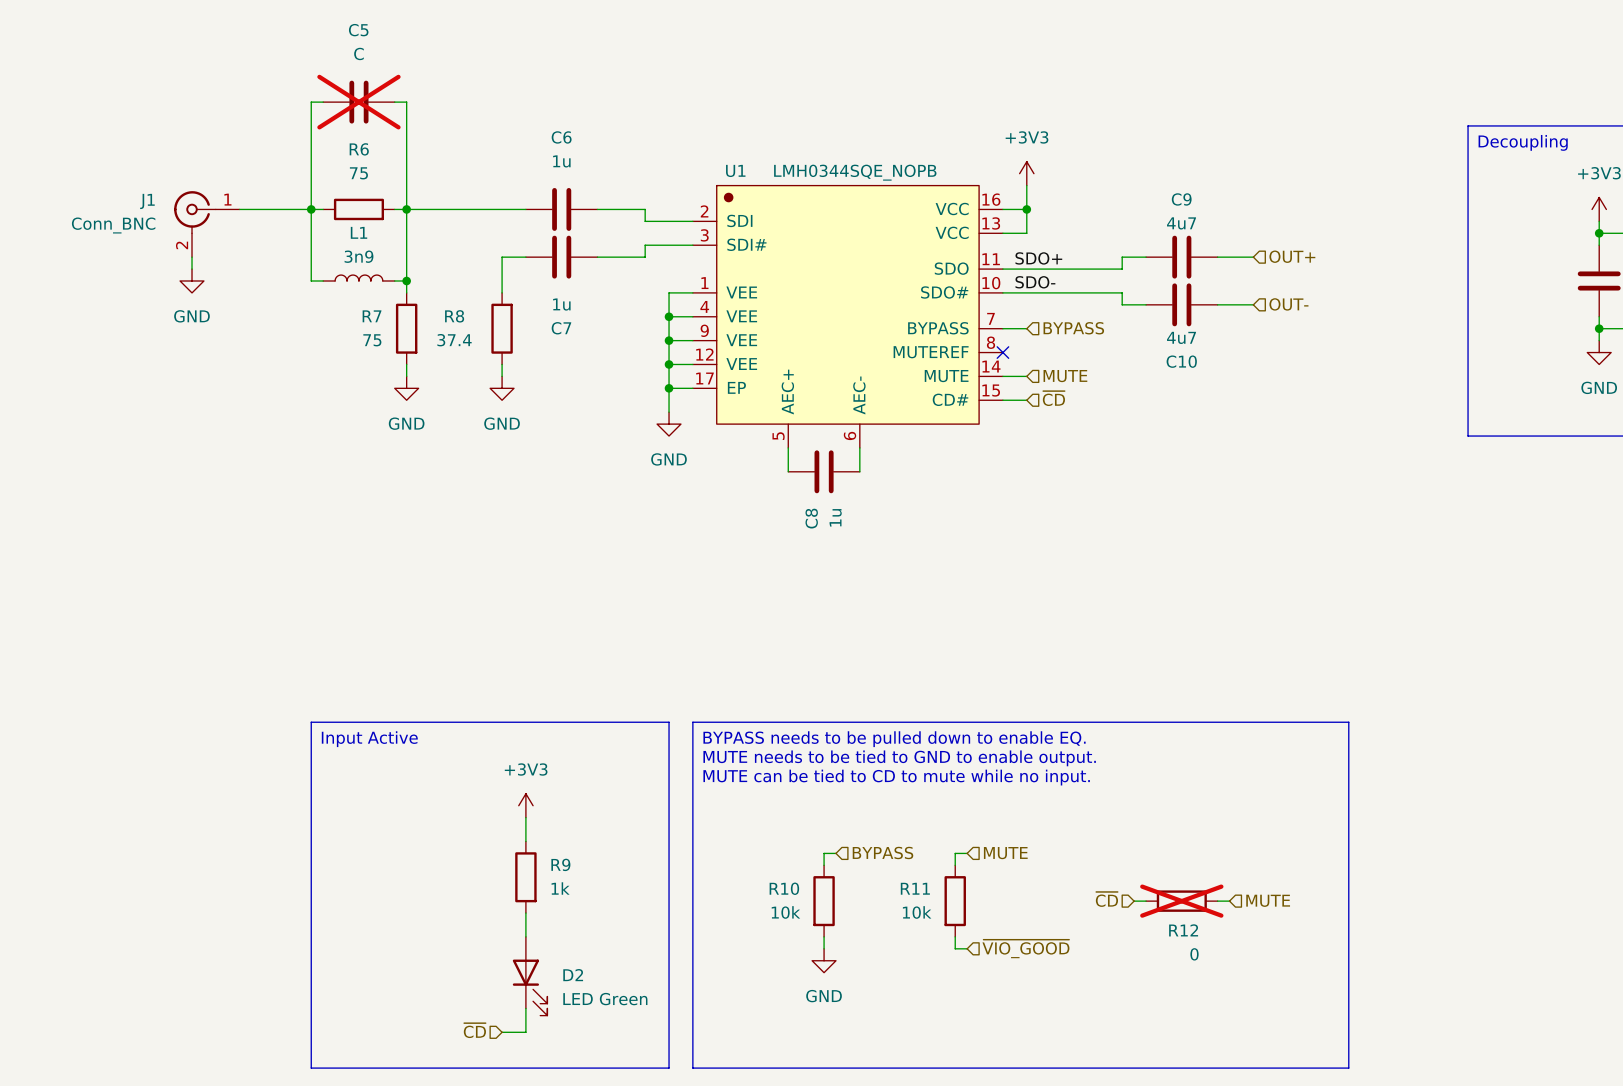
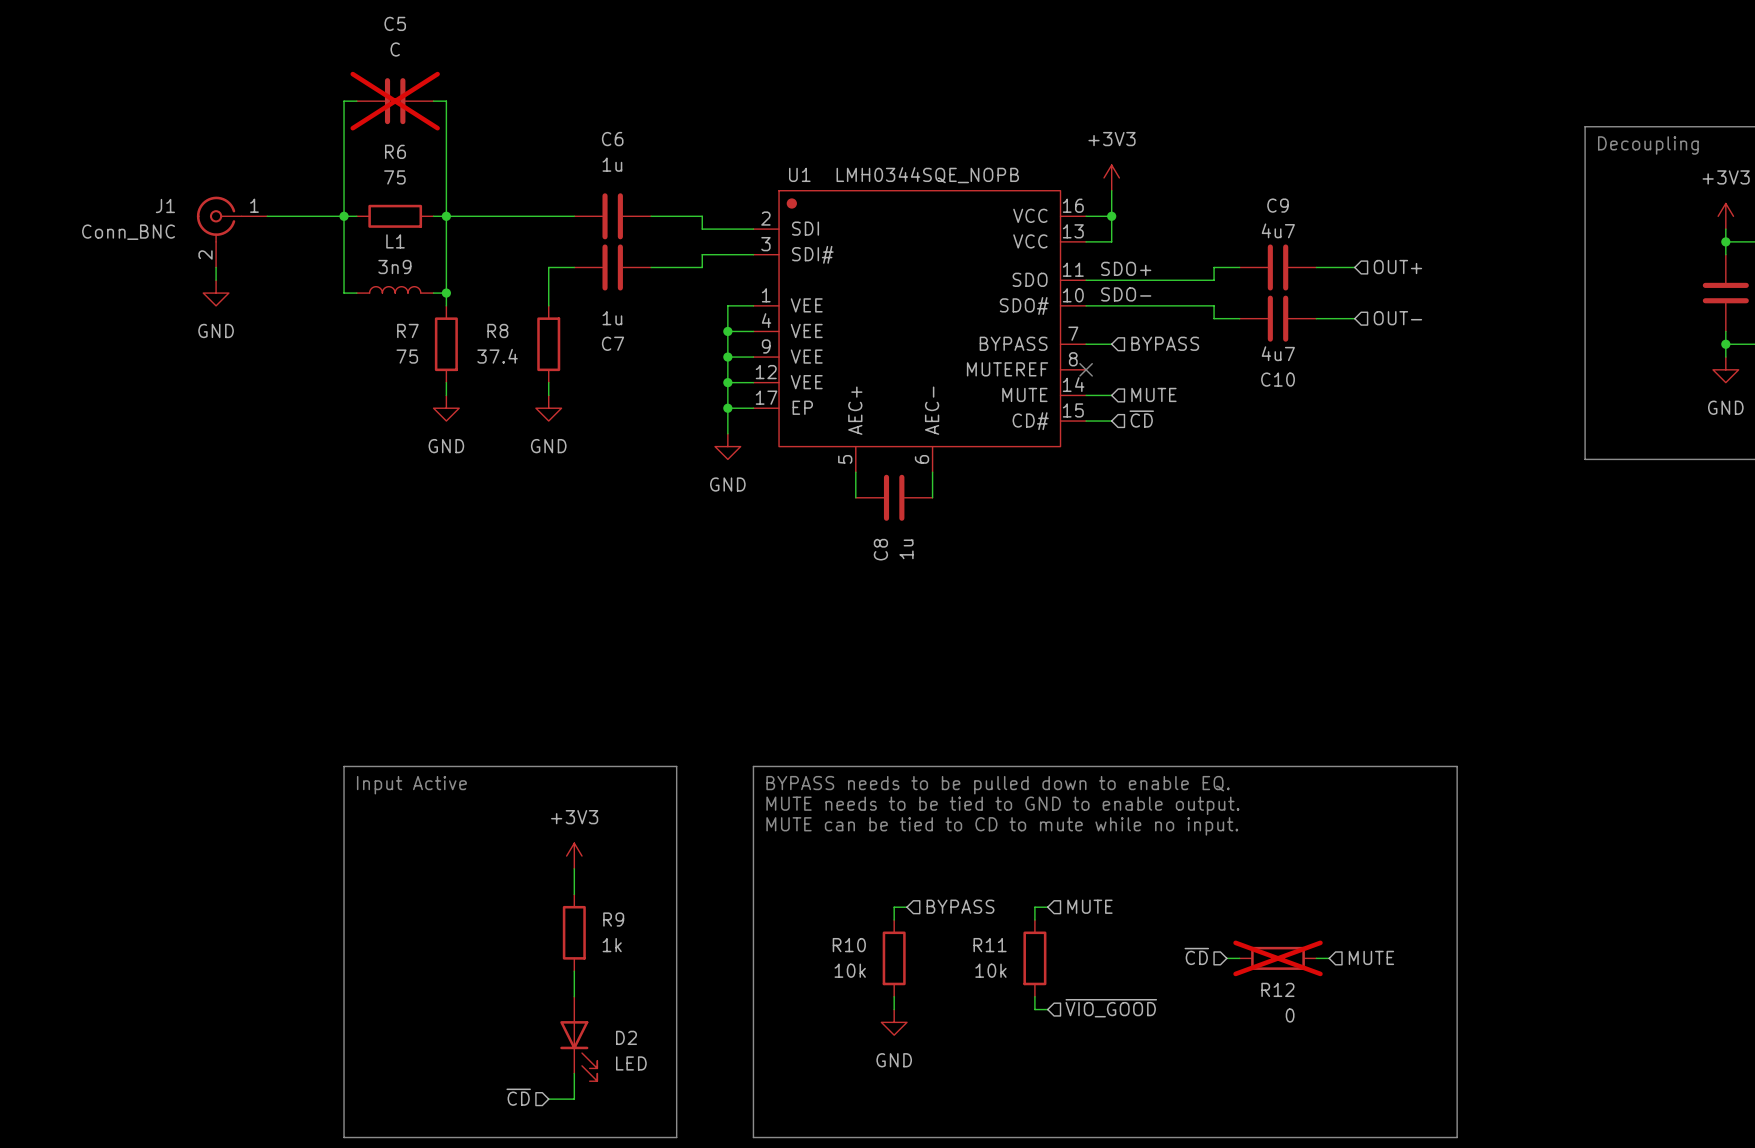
line: (621, 722) (669, 722) (669, 1068) (621, 1068) -> (676, 766) (676, 1137)
D2 value: LED Green (605, 999) -> LED (631, 1063)

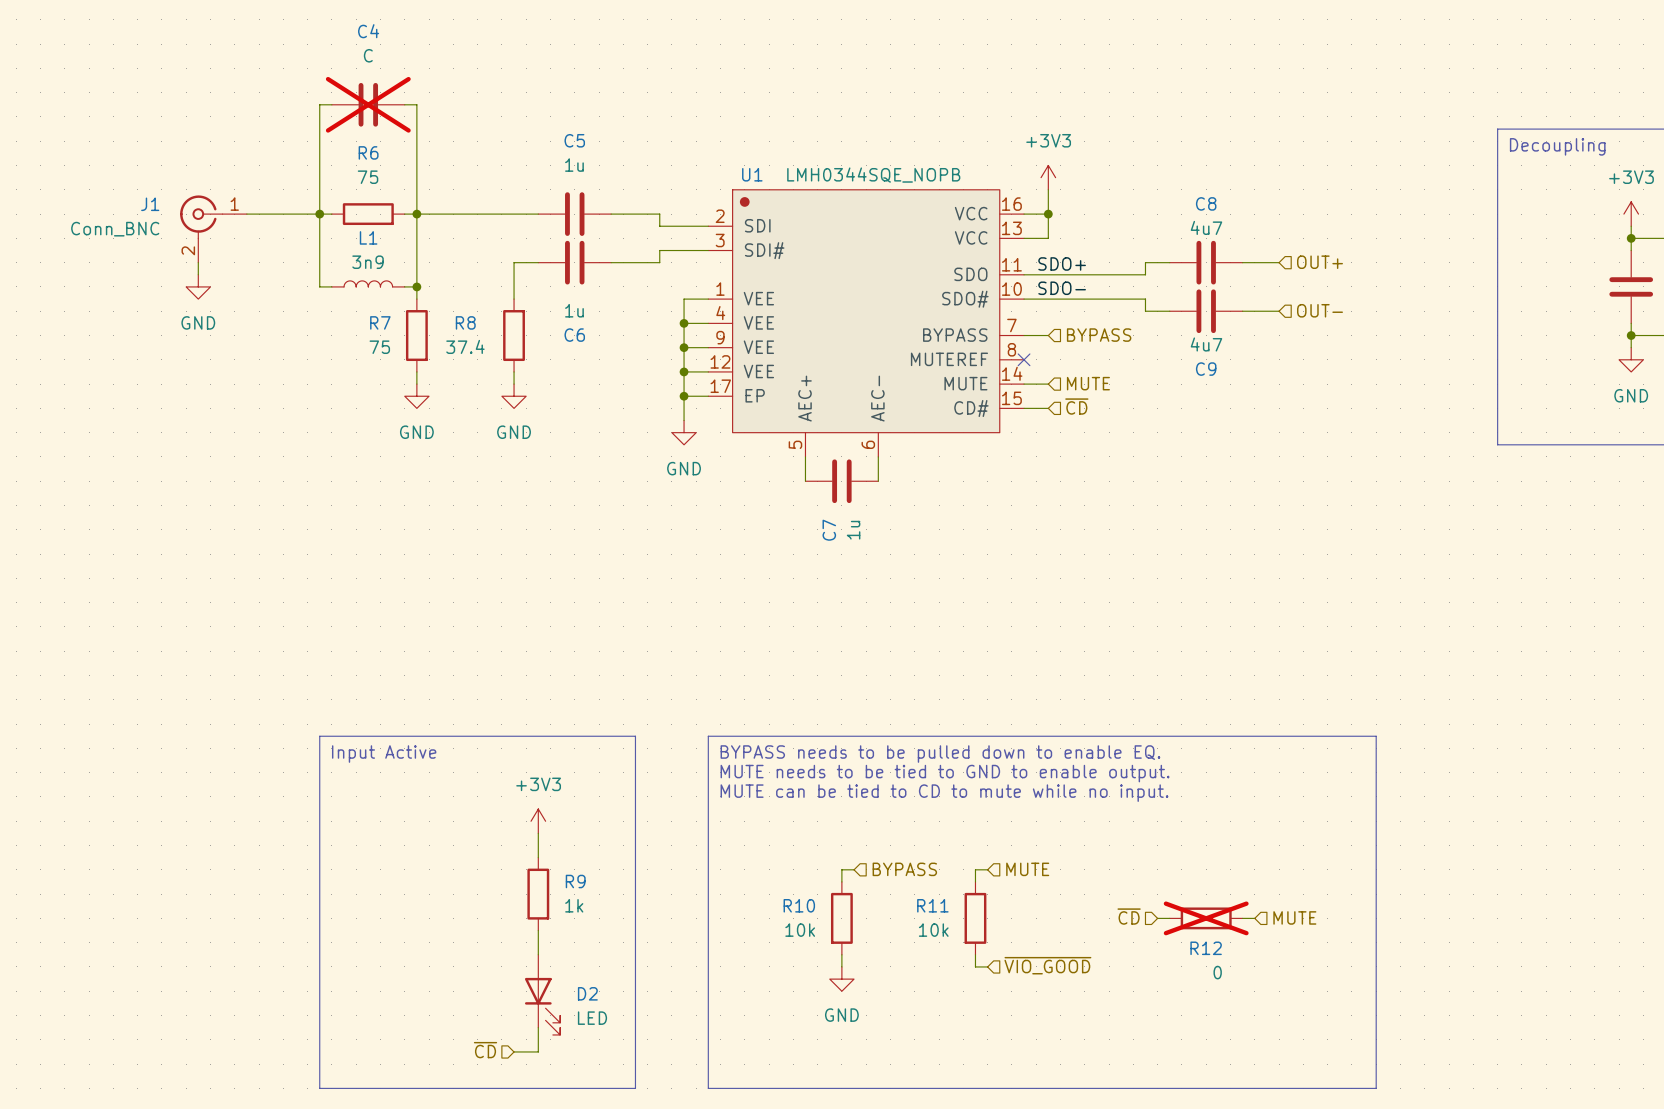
C5 name: C5 (395, 23) -> C4 (368, 31)
C6 name: C6 (612, 139) -> C5 (574, 140)
C9 name: C9 (1278, 205) -> C8 (1206, 203)
C7 name: C7 (613, 343) -> C6 (574, 335)
C10 name: C10 (1278, 379) -> C9 (1206, 369)
C8 name: C8 (880, 549) -> C7 (829, 530)

